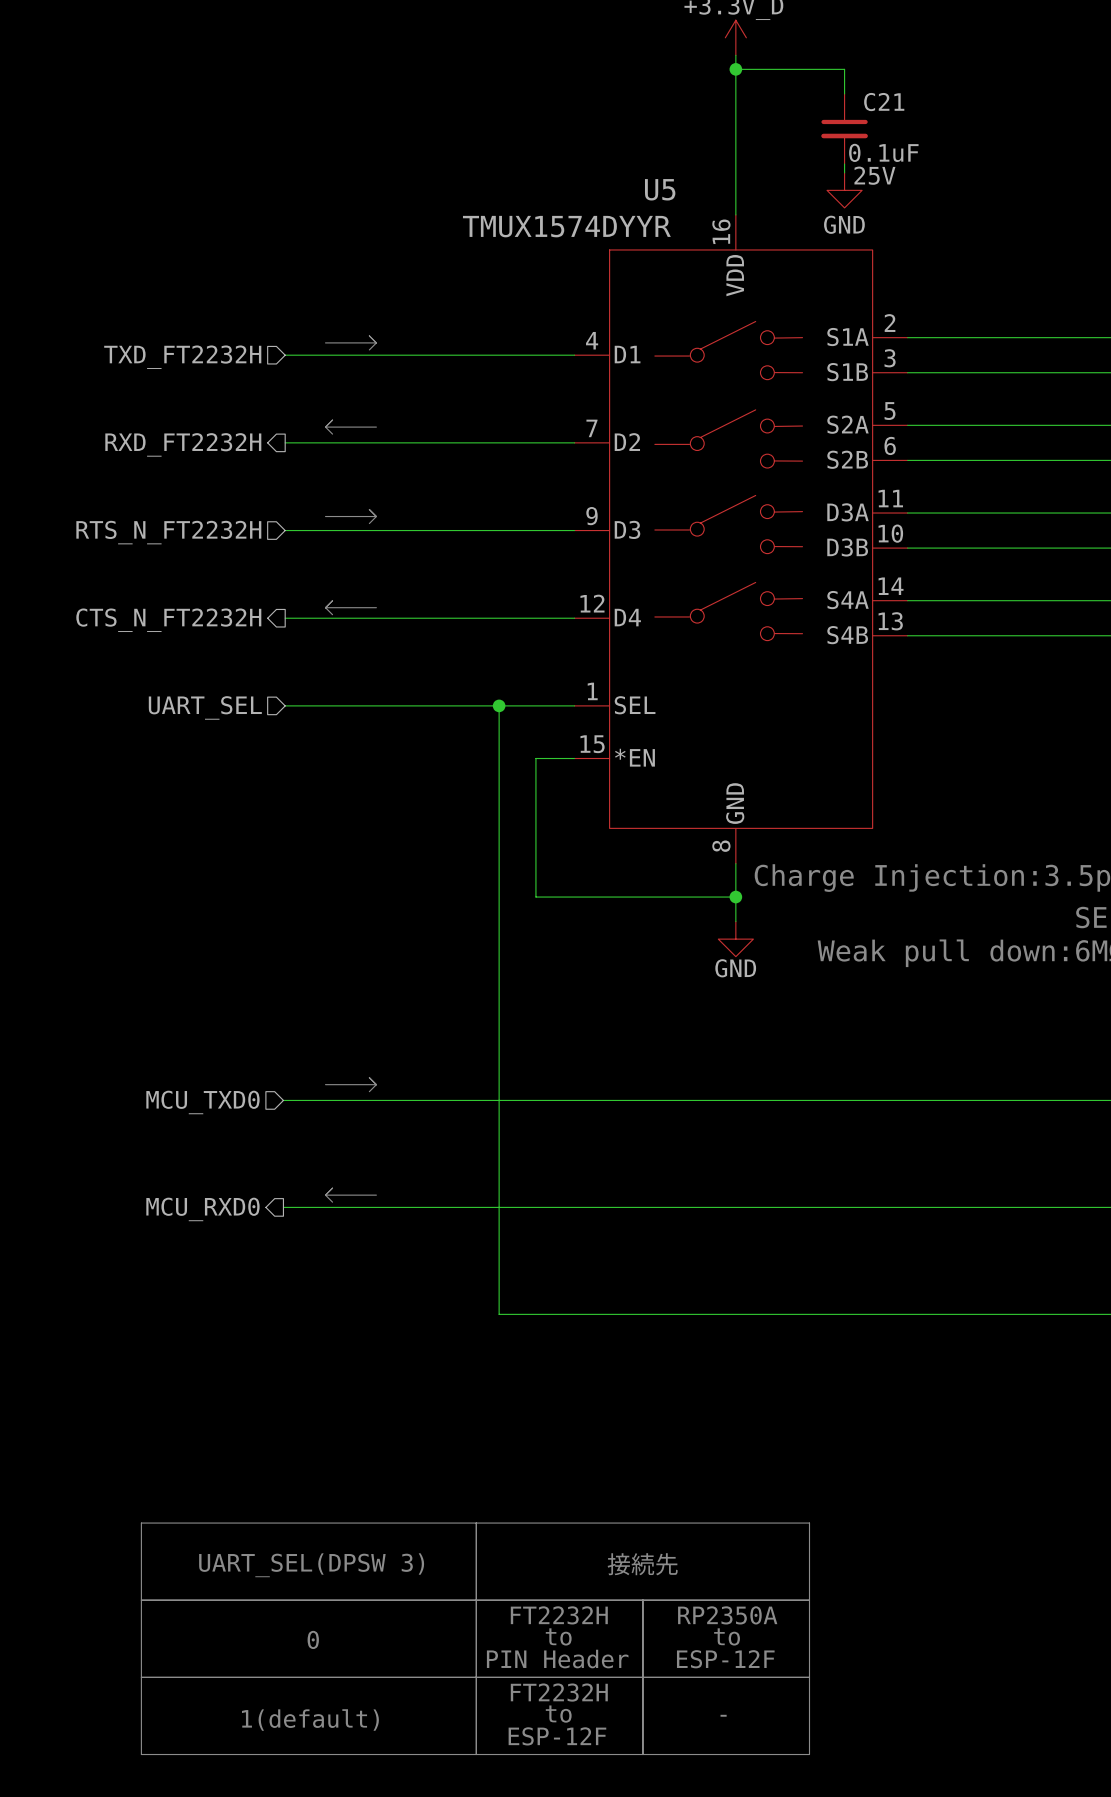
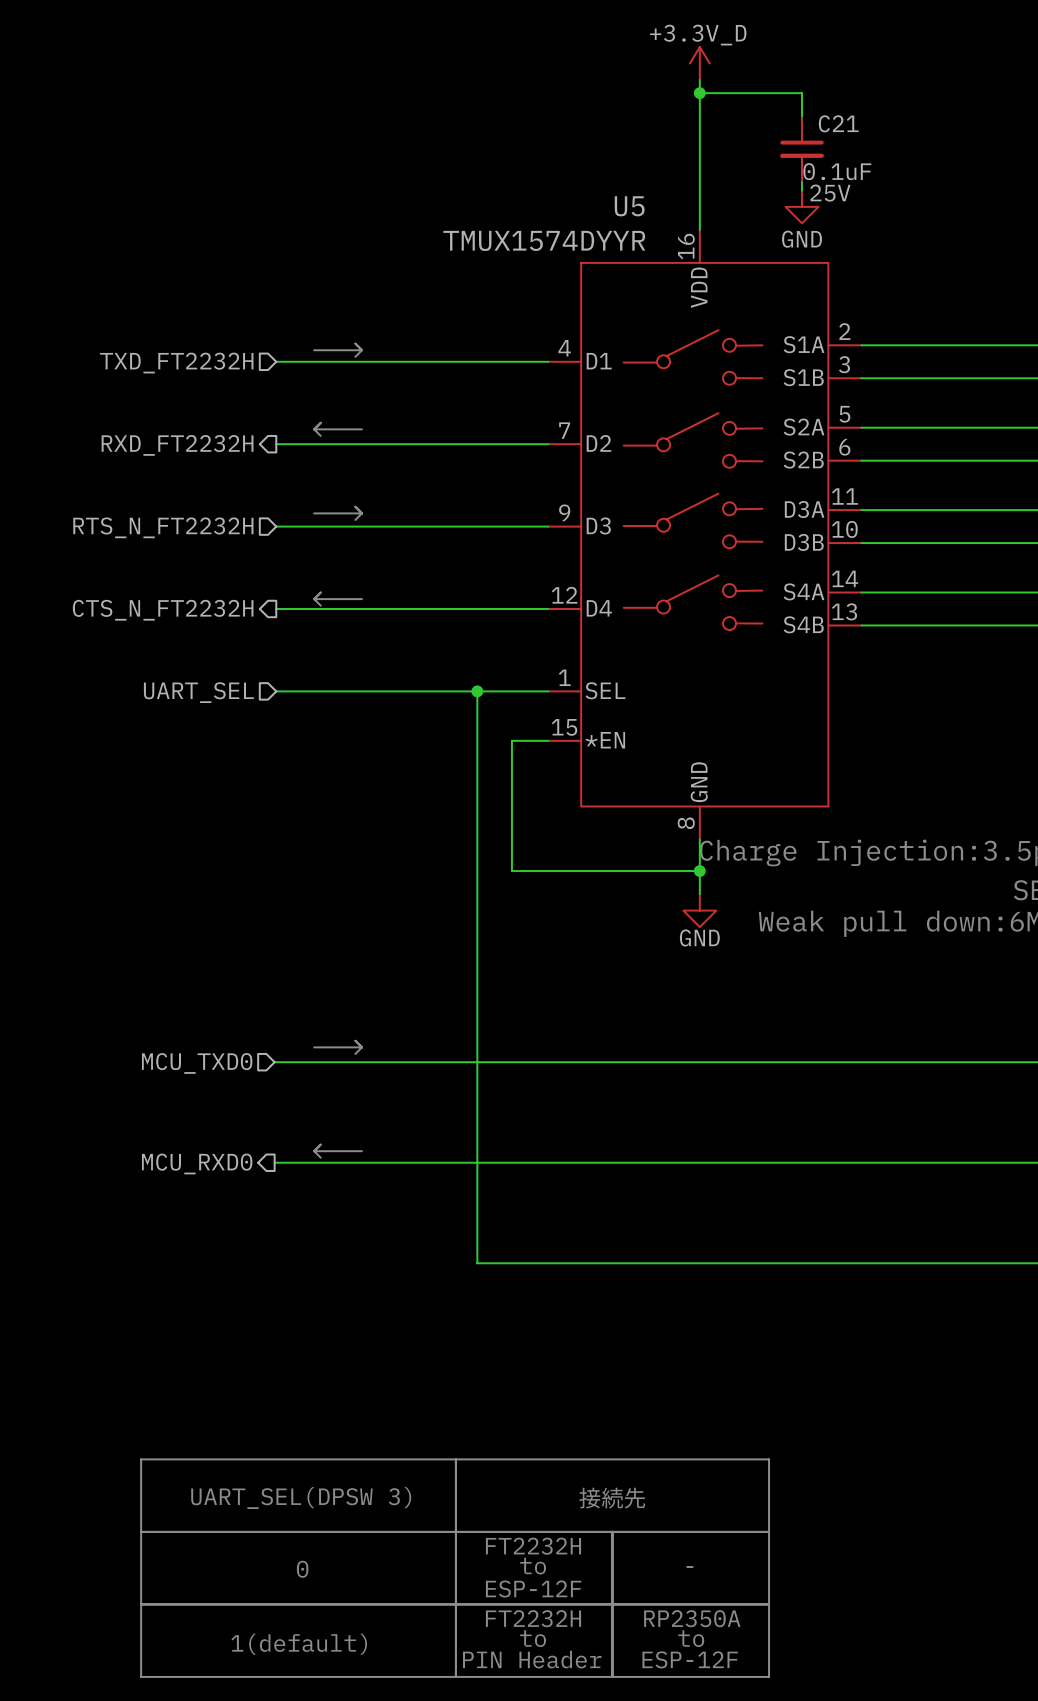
text position: RP2350A (727, 1615) -> RP2350A (692, 1618)
text: to (727, 1636) -> - (689, 1567)
text: PIN Header (557, 1659) -> ESP-12F (533, 1589)
text position: ESP-12F (725, 1659) -> ESP-12F (690, 1659)
text: - (723, 1715) -> to (691, 1638)
text: ESP-12F (557, 1736) -> PIN Header (532, 1659)

